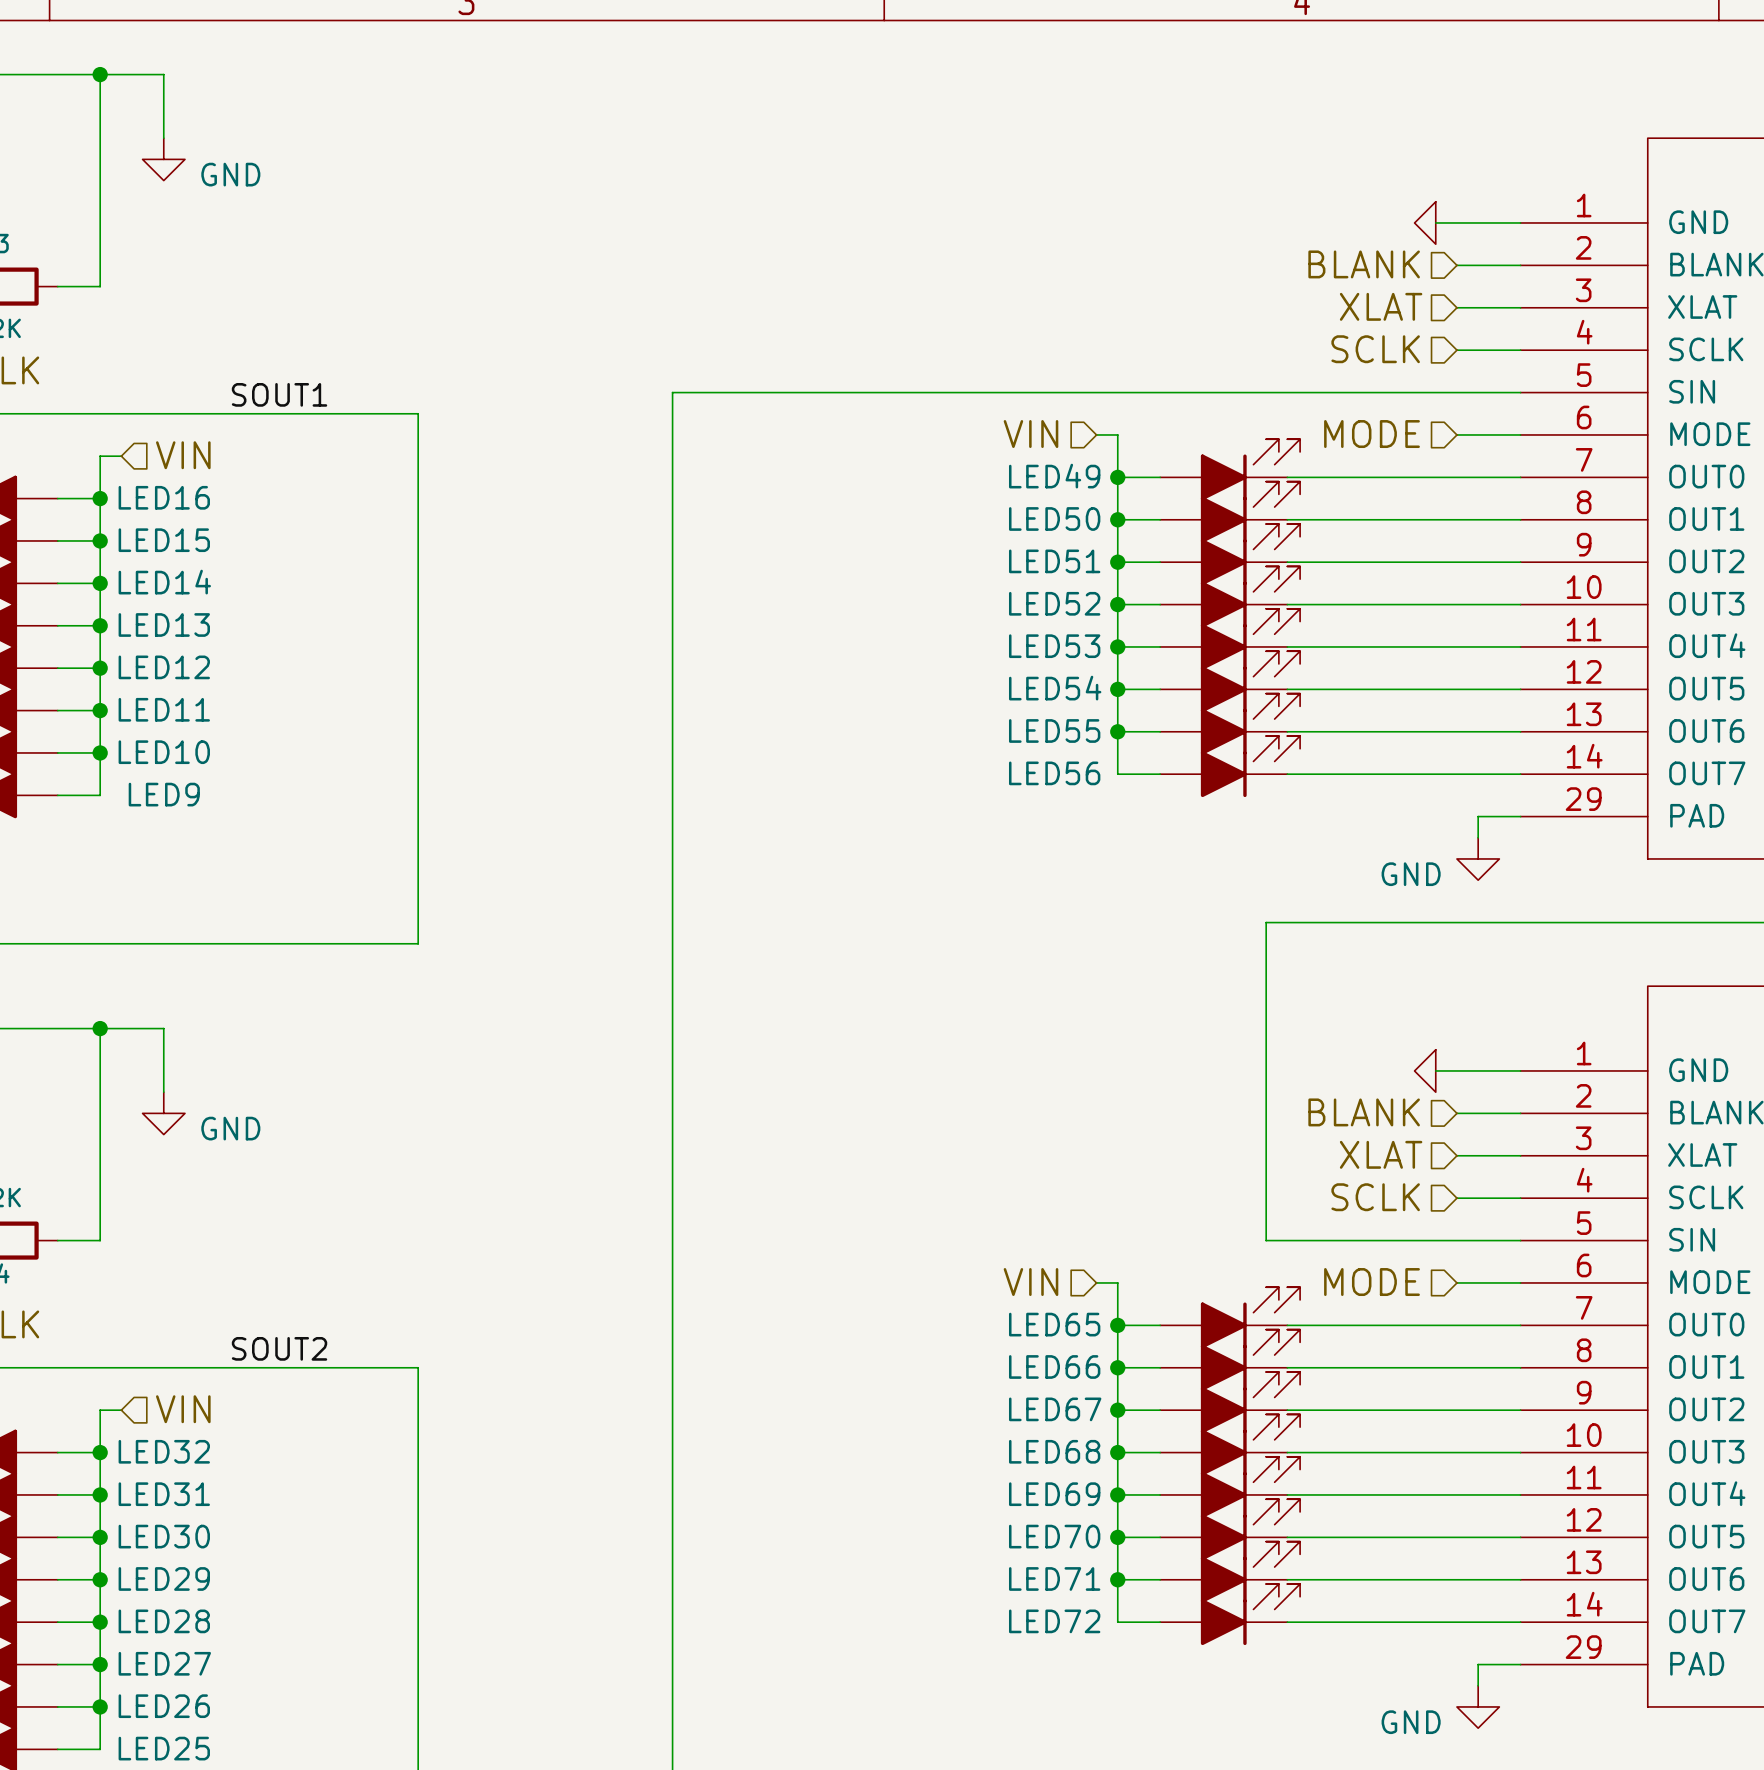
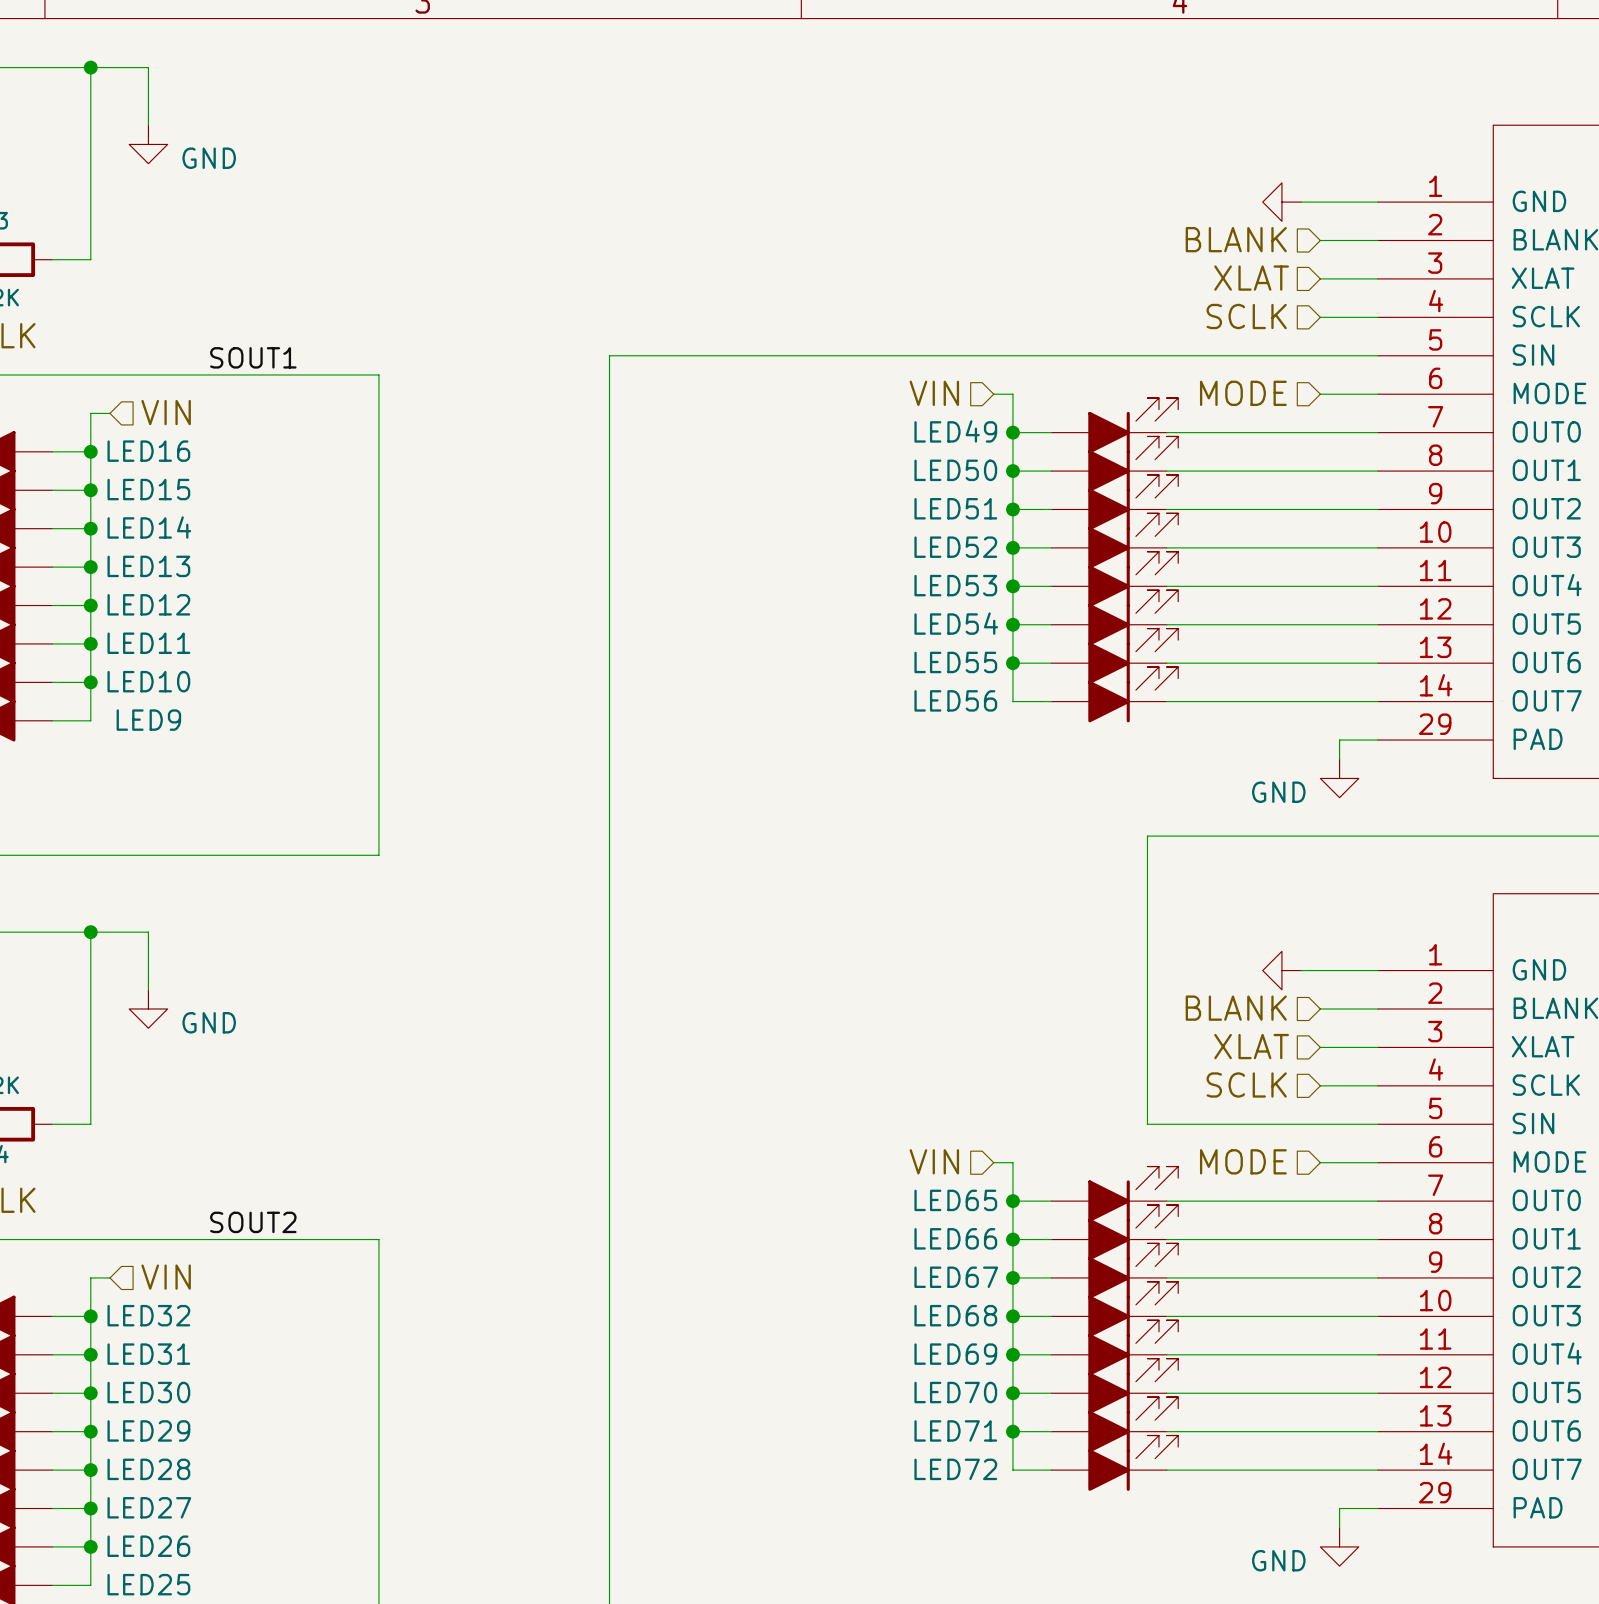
power symbol shape: [1414, 201, 1436, 245] -> [1262, 182, 1302, 222]
power symbol shape: [1414, 1049, 1436, 1093] -> [1262, 951, 1302, 990]

